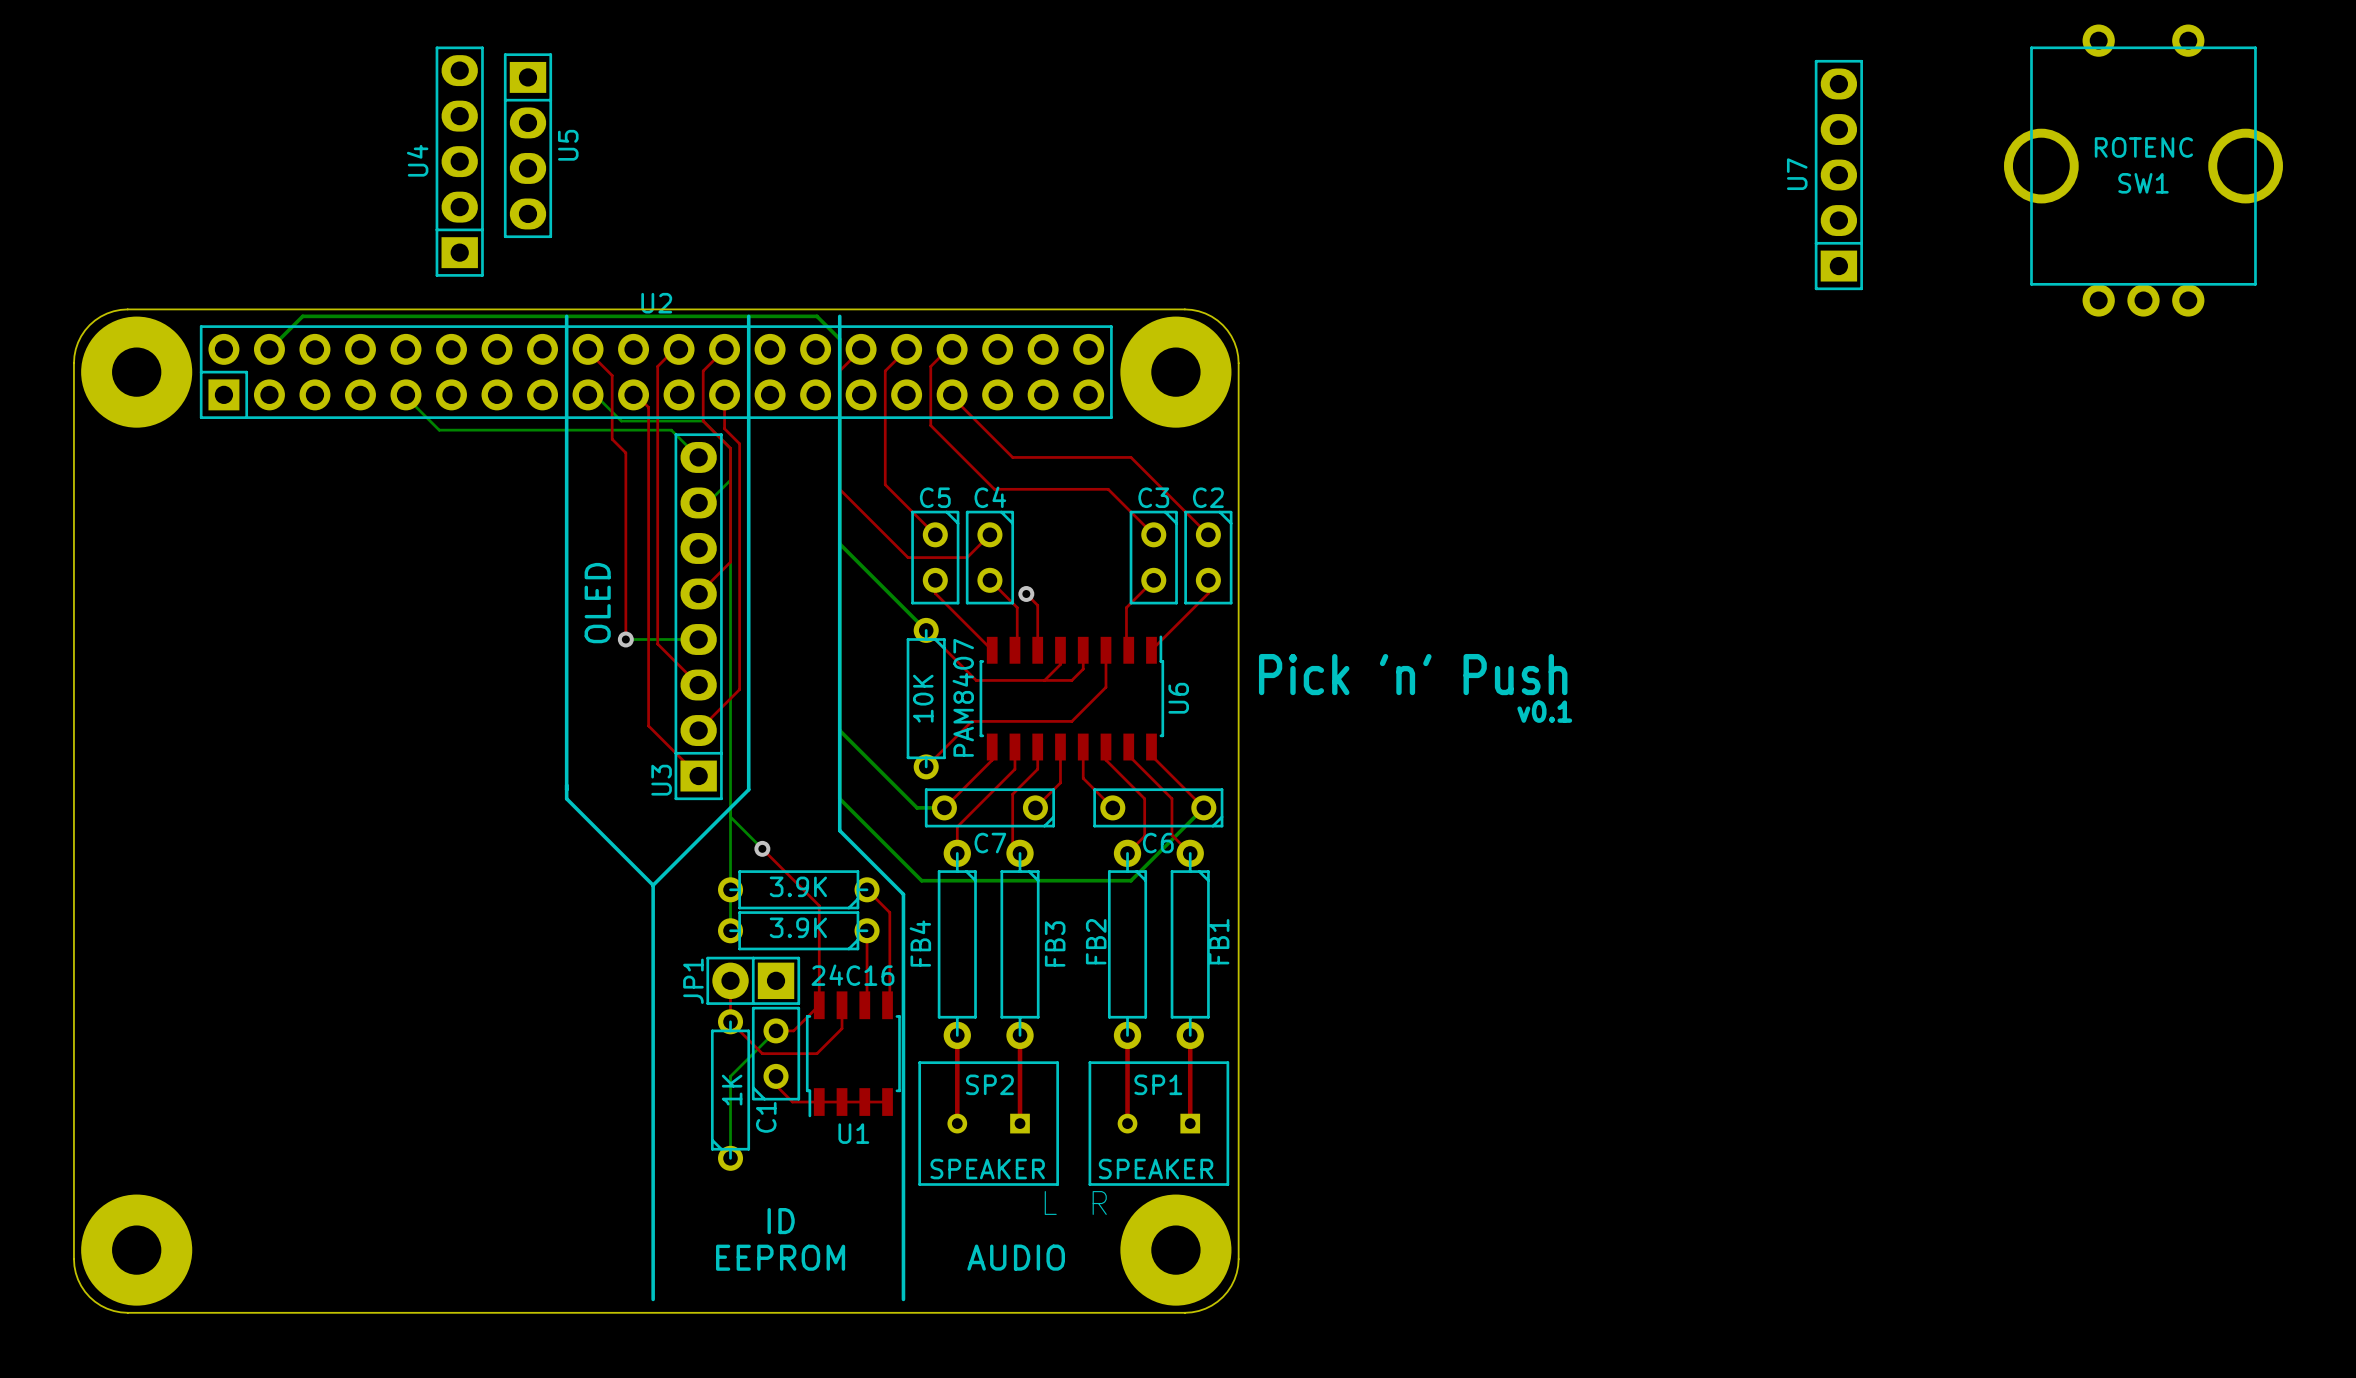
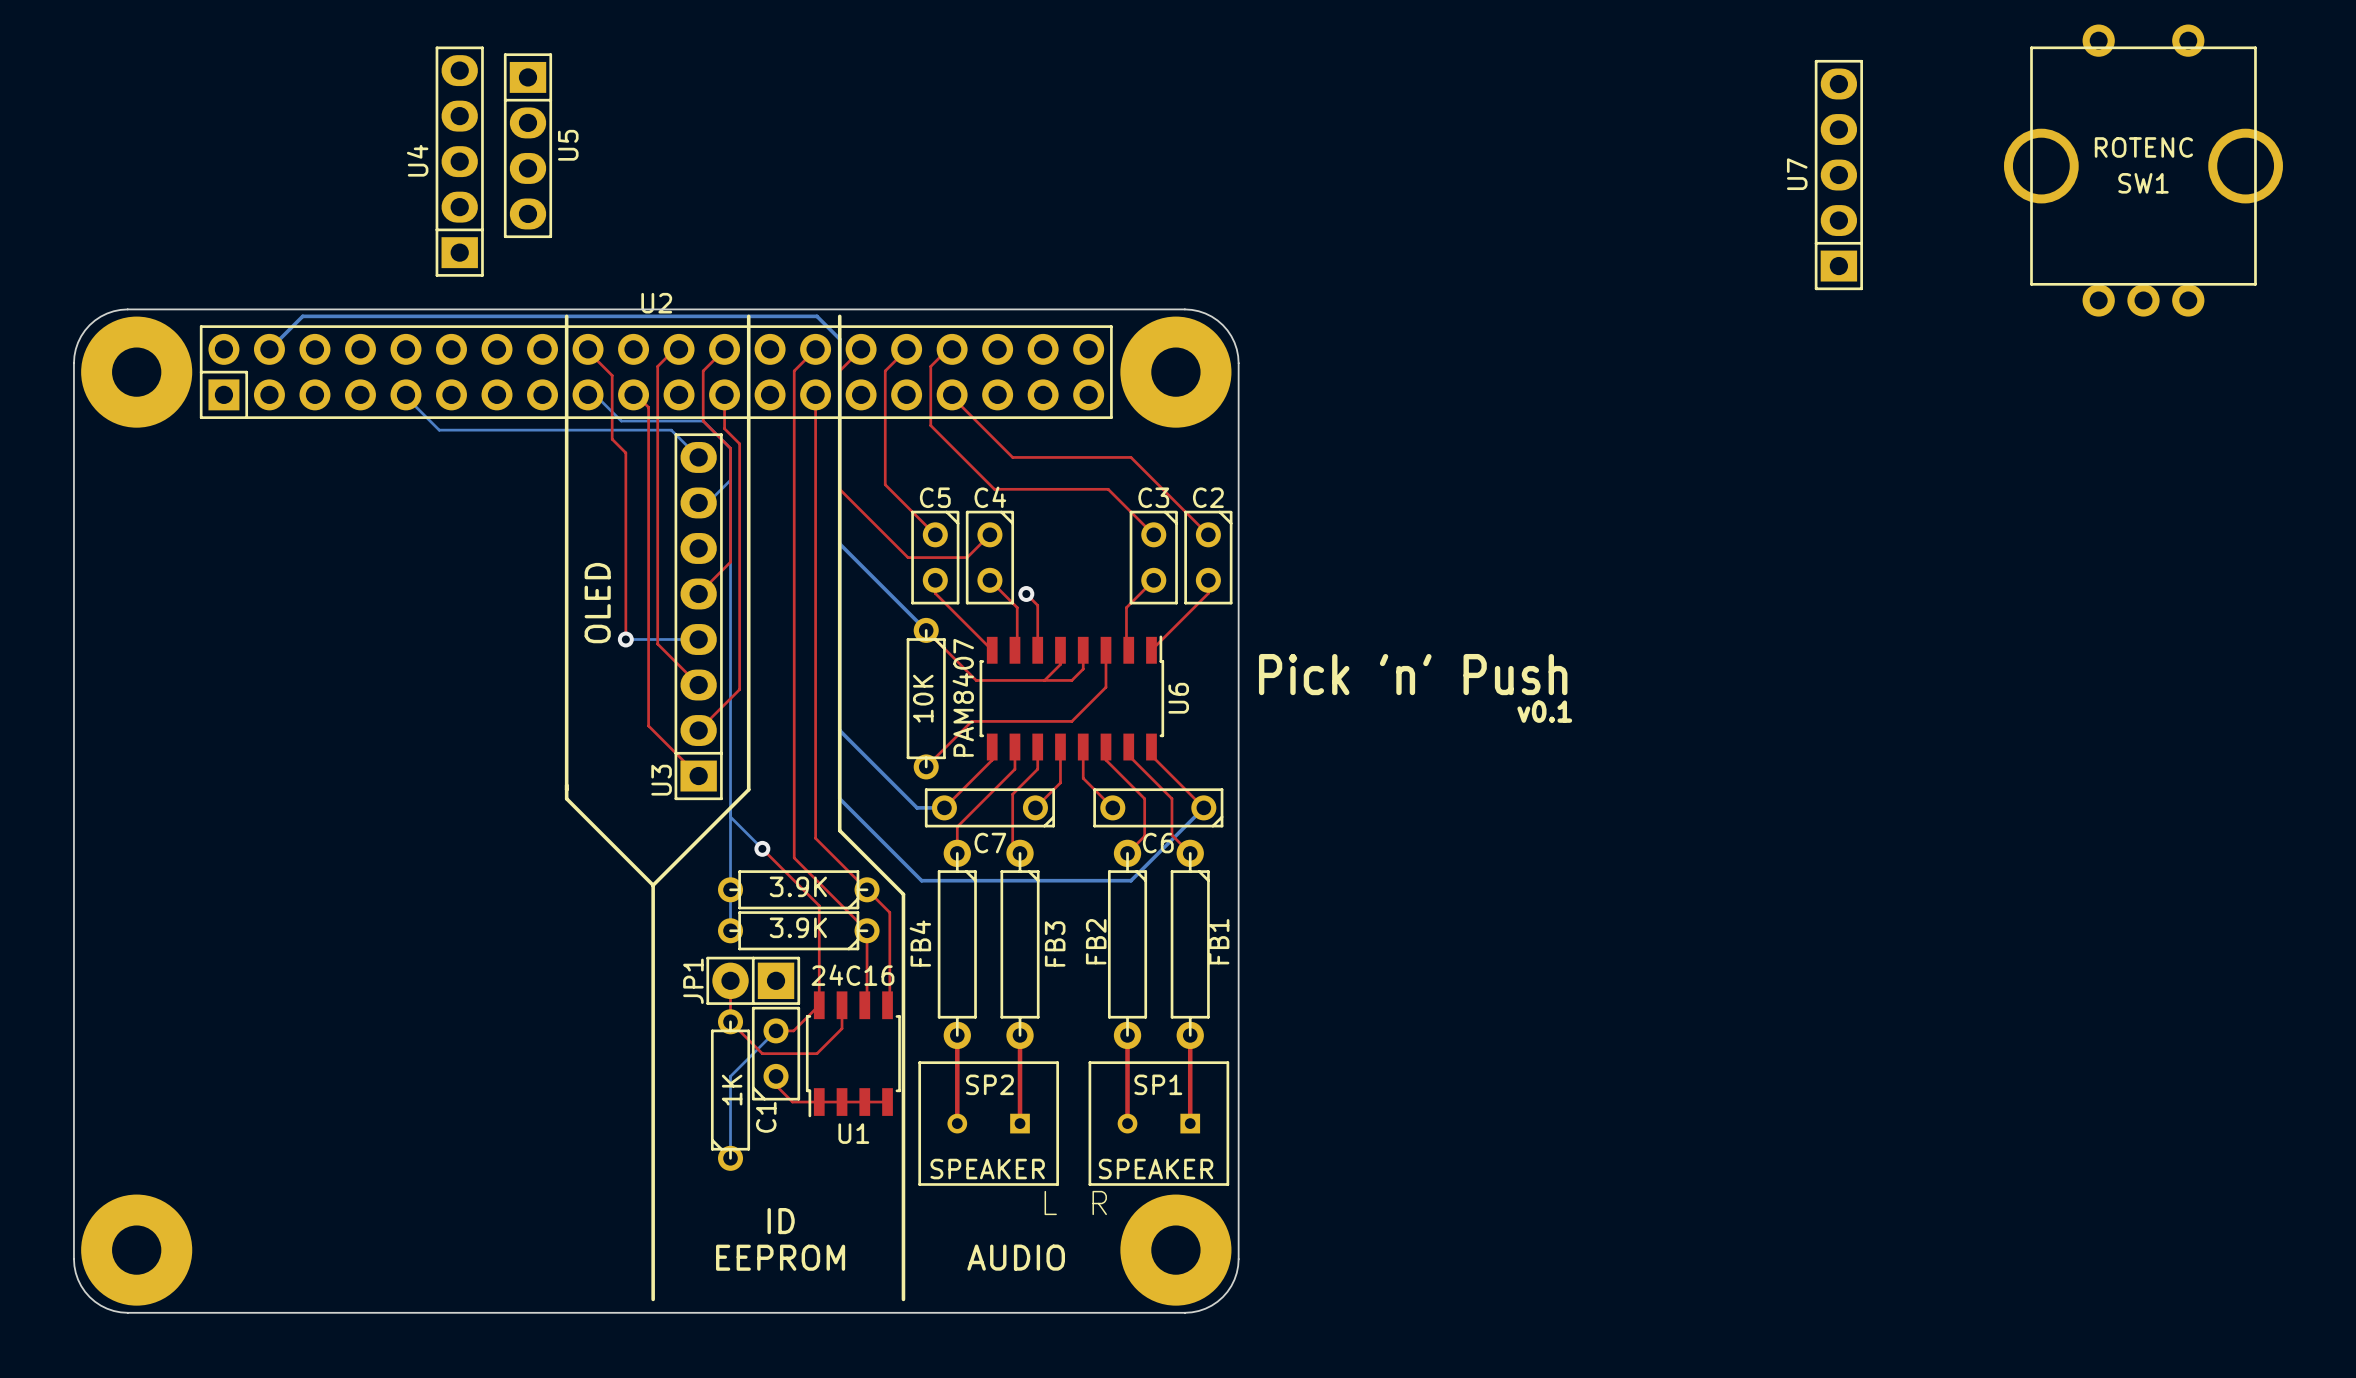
top track: none -> (815, 349) (794, 370) (794, 857) (867, 930)
top track: none -> (815, 394) (815, 838) (867, 889)

